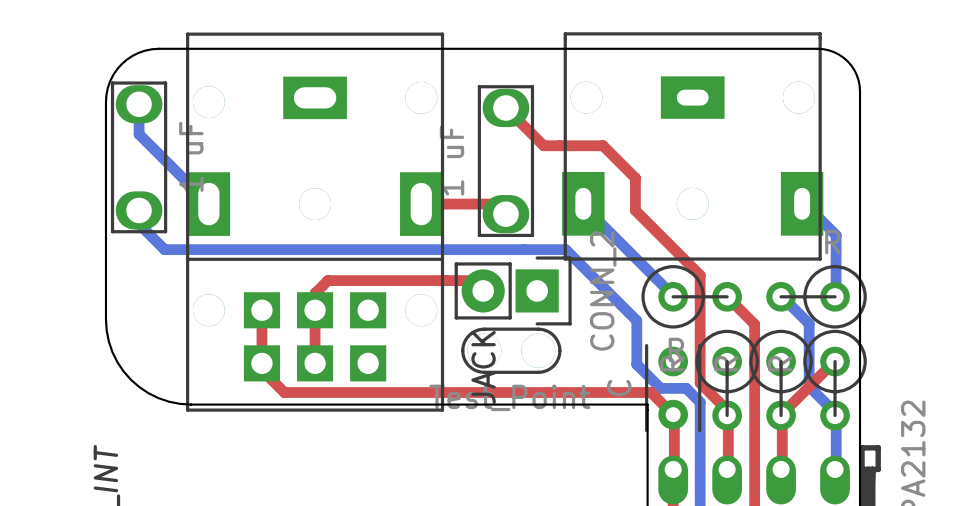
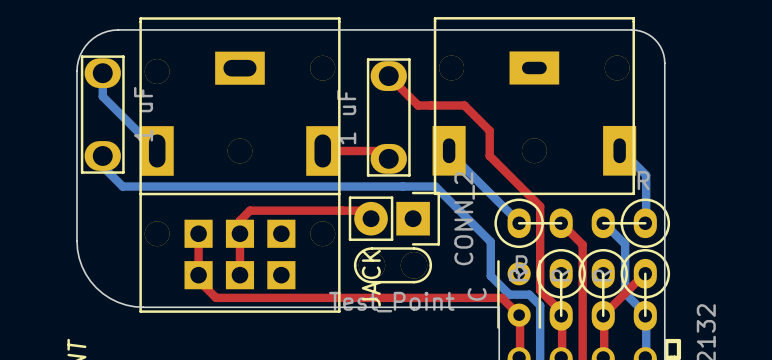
part footprint: [641, 265, 742, 329] -> [494, 198, 573, 249]
part footprint: [766, 265, 867, 329] -> [591, 198, 671, 249]
part footprint: [695, 329, 759, 431] -> [536, 248, 586, 331]
part footprint: [749, 329, 813, 431] -> [578, 248, 629, 331]
part footprint: [803, 329, 867, 431] -> [620, 248, 671, 331]

